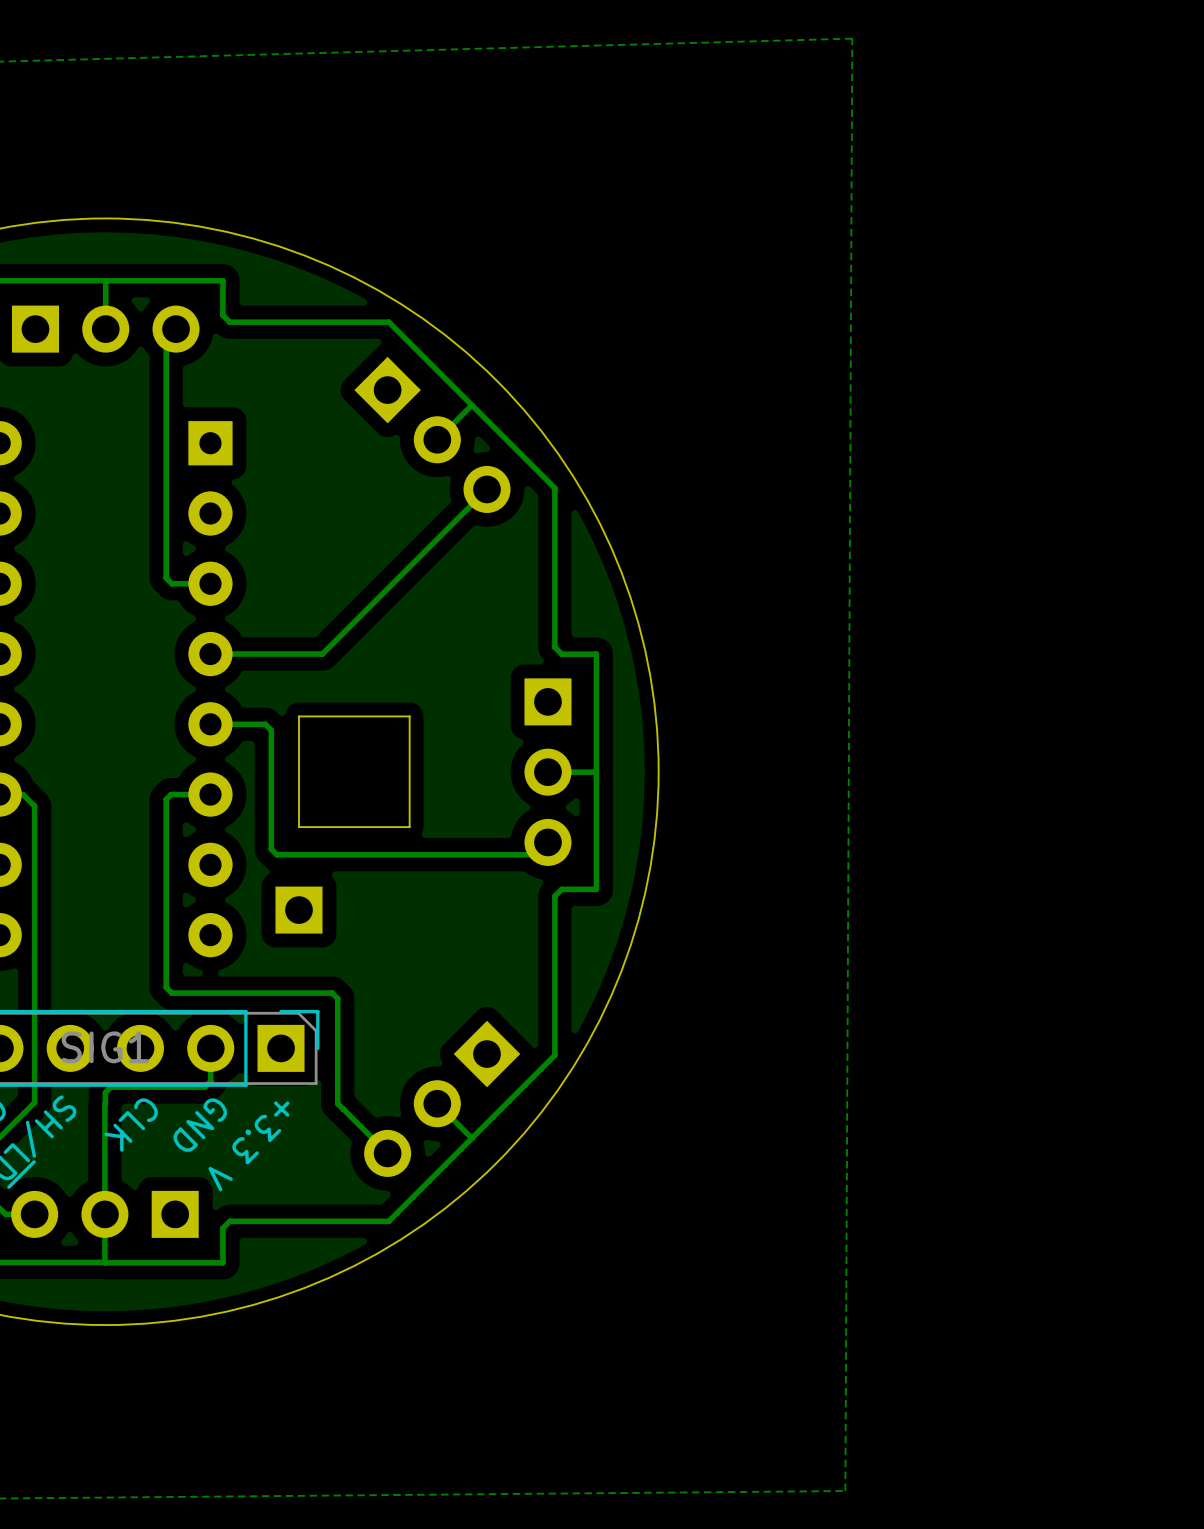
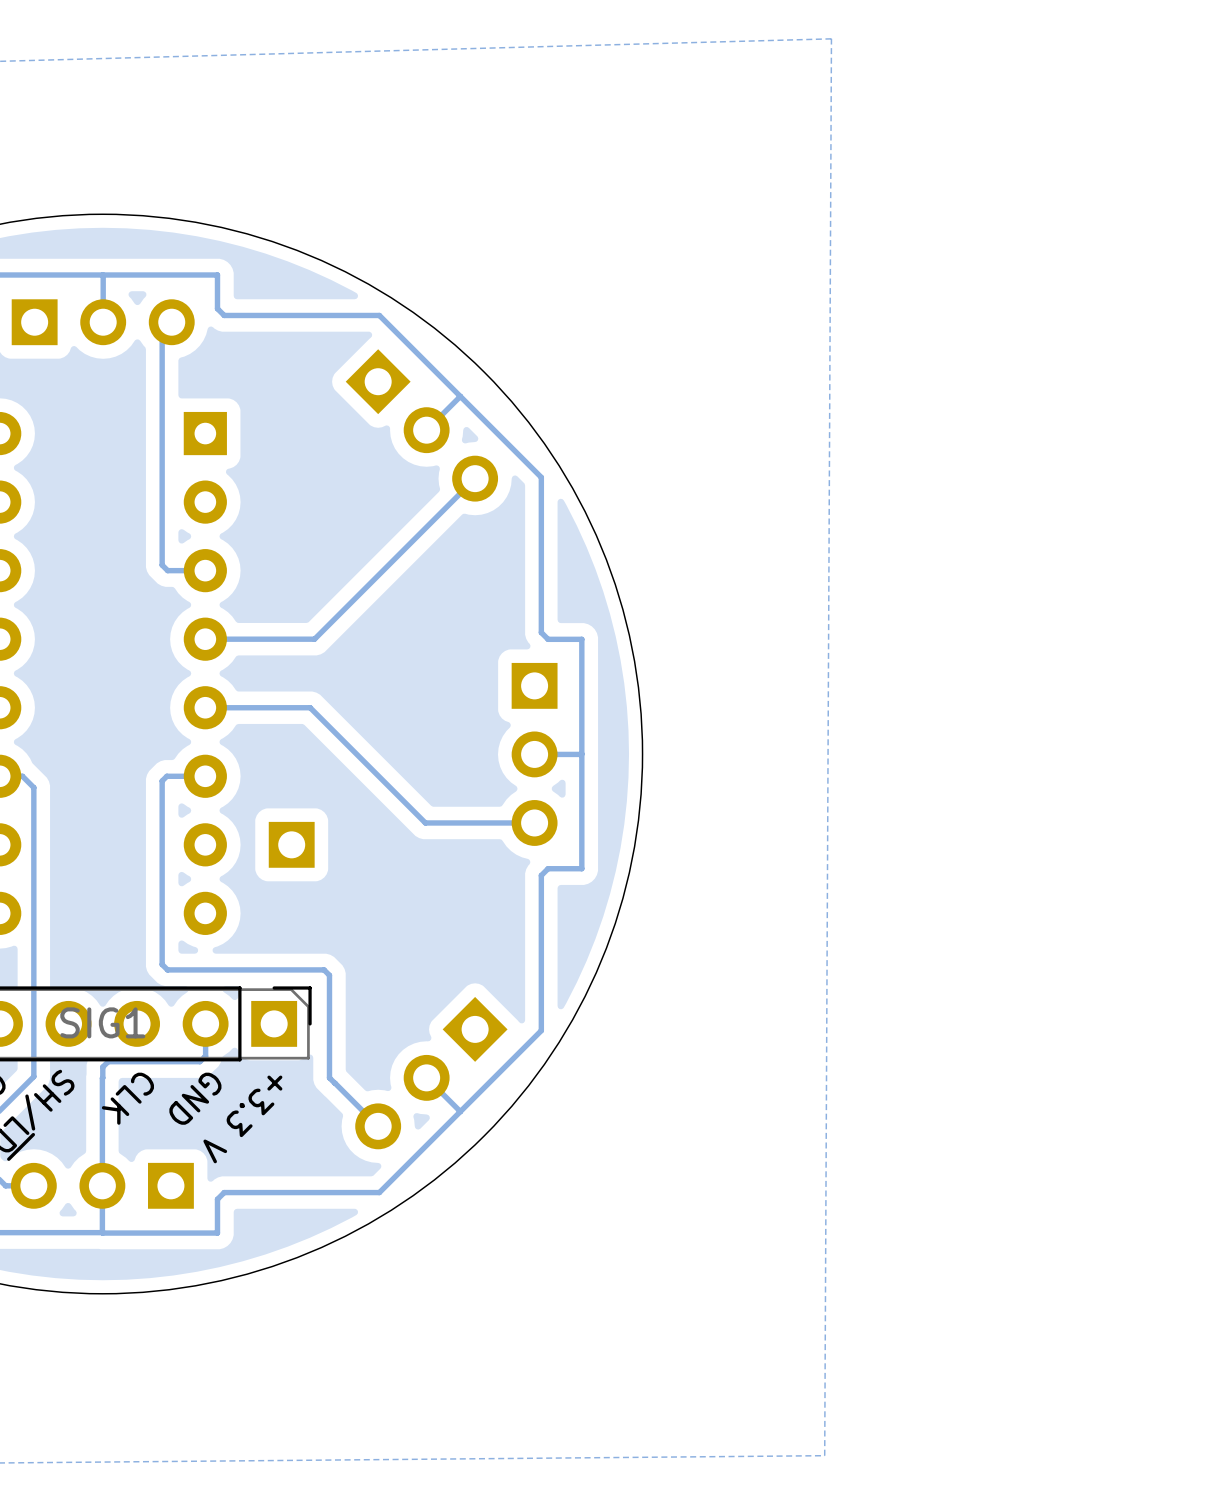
board edge: (409, 716) (298, 716) (298, 827) (409, 827) (409, 716) -> none
track: (265, 724) (271, 730) (271, 849) (276, 854) (535, 854) (547, 842) -> (258, 707) (310, 707) (425, 822) (534, 822)
part position: (298, 910) -> (291, 844)

